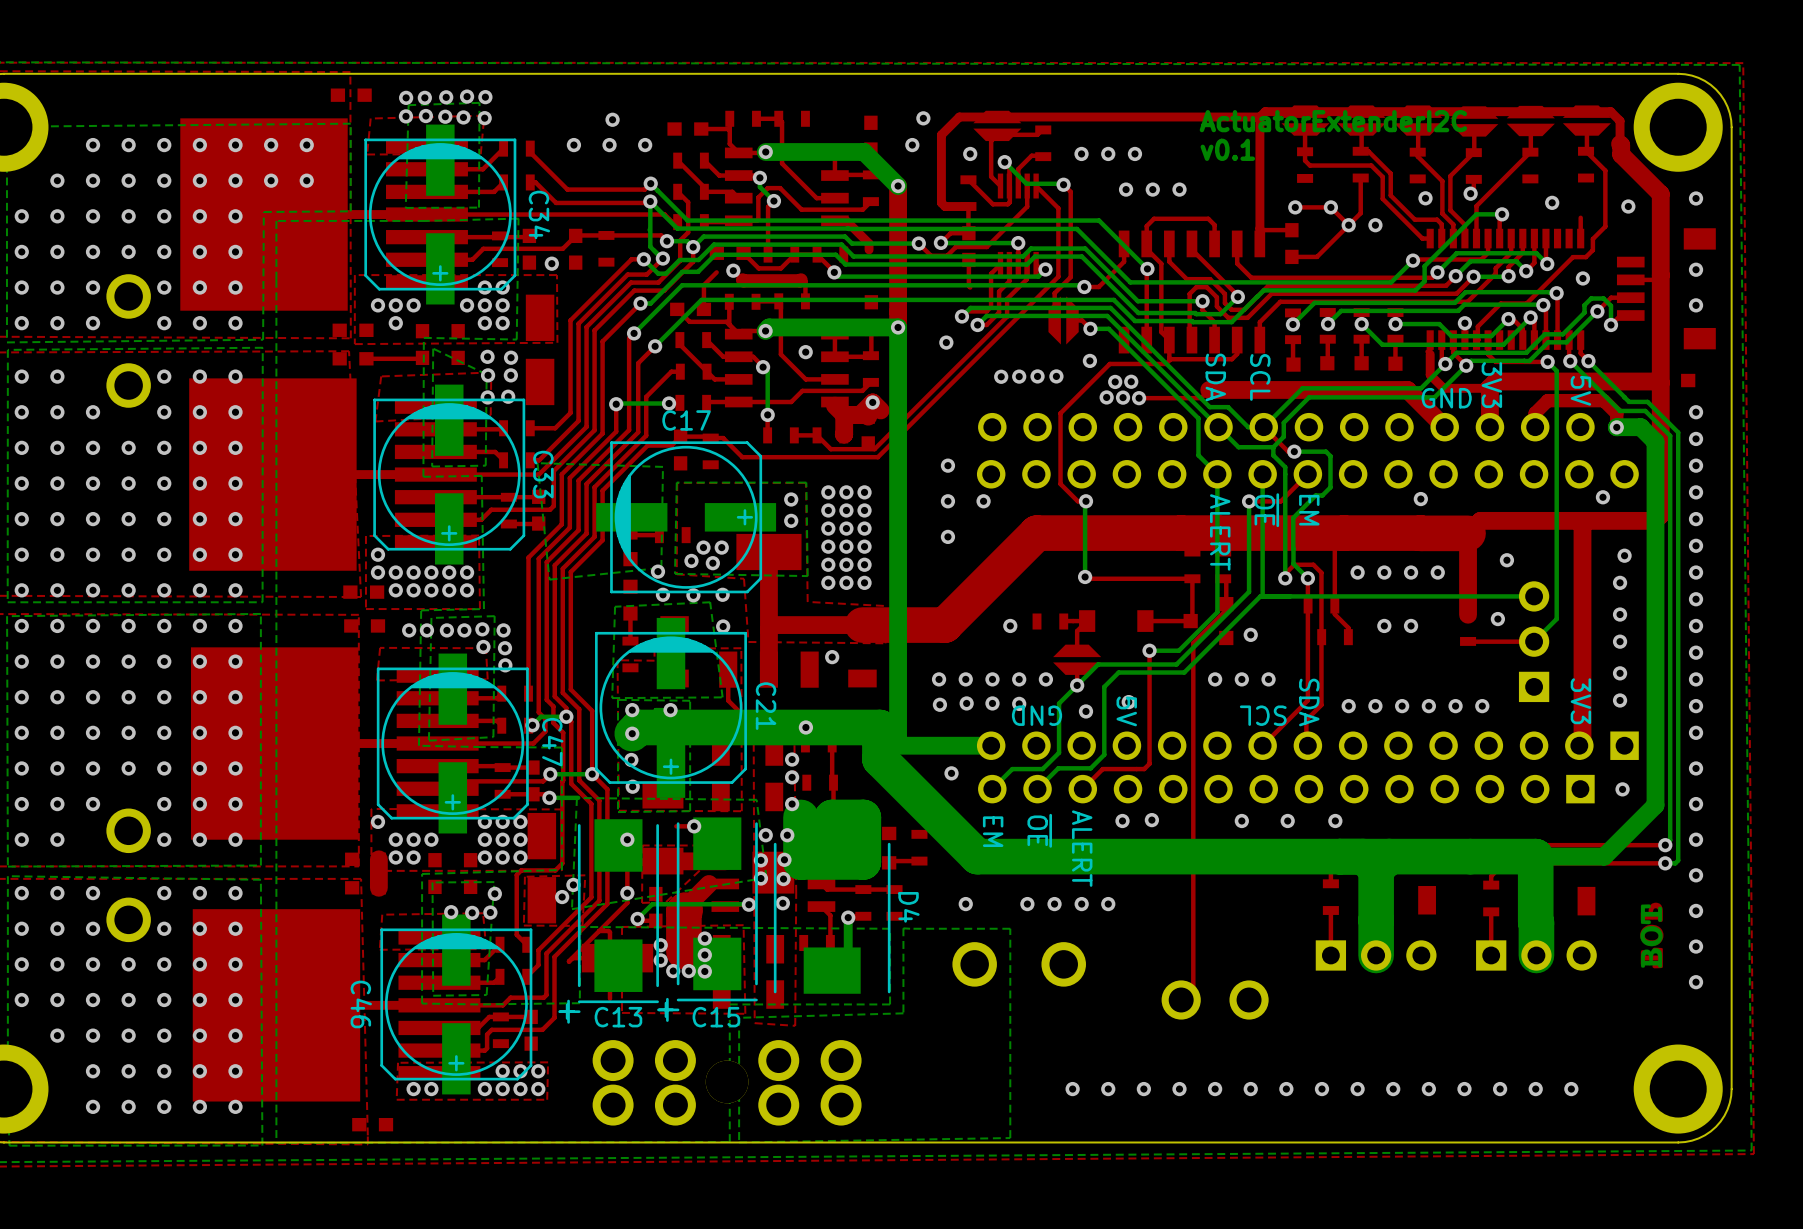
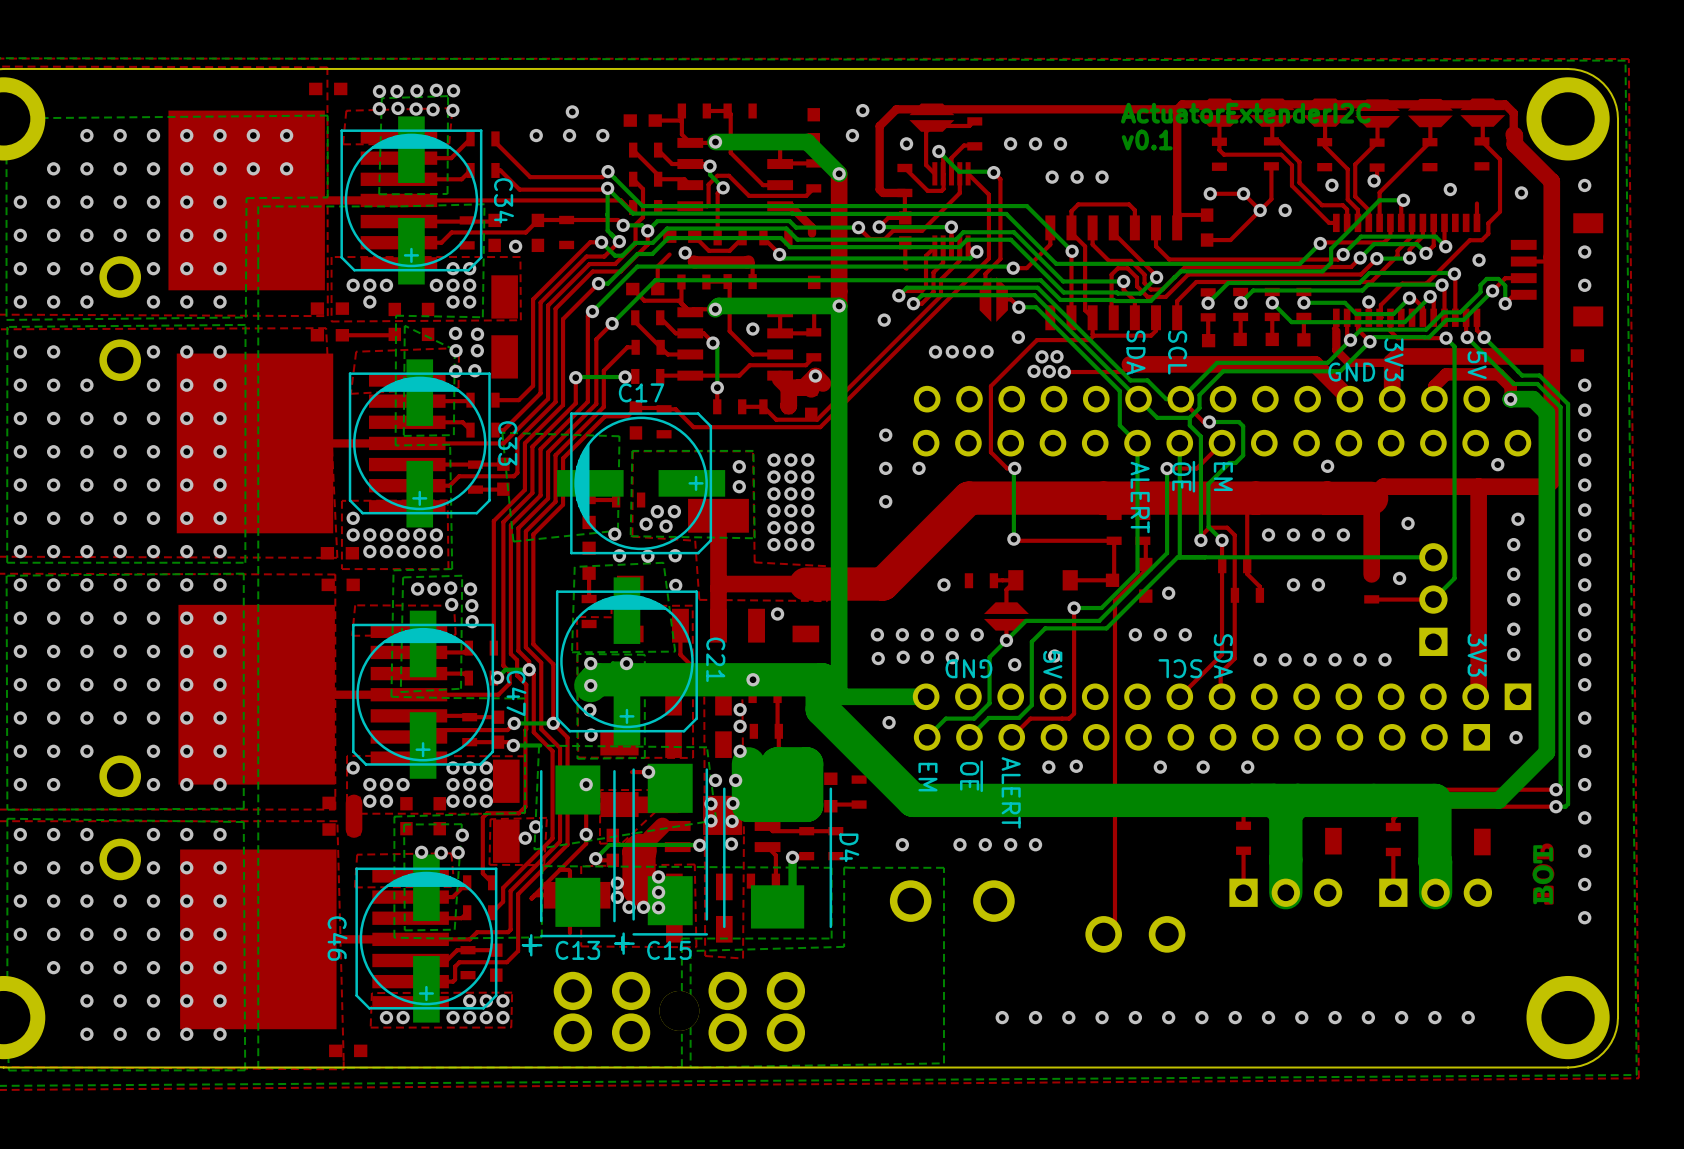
via: (409, 630) -> none
via: (426, 630) -> none

